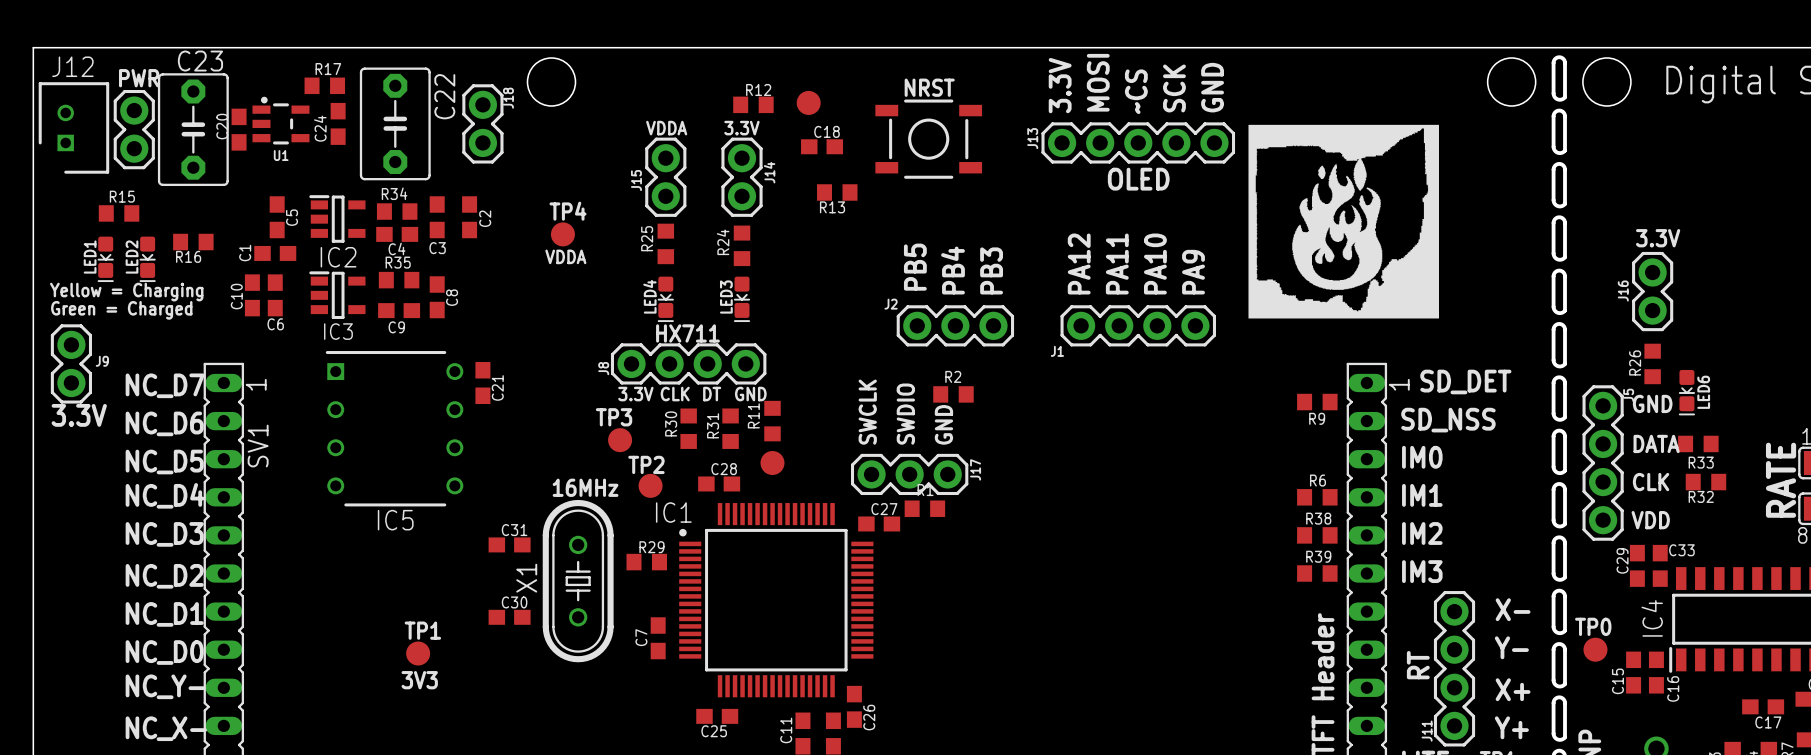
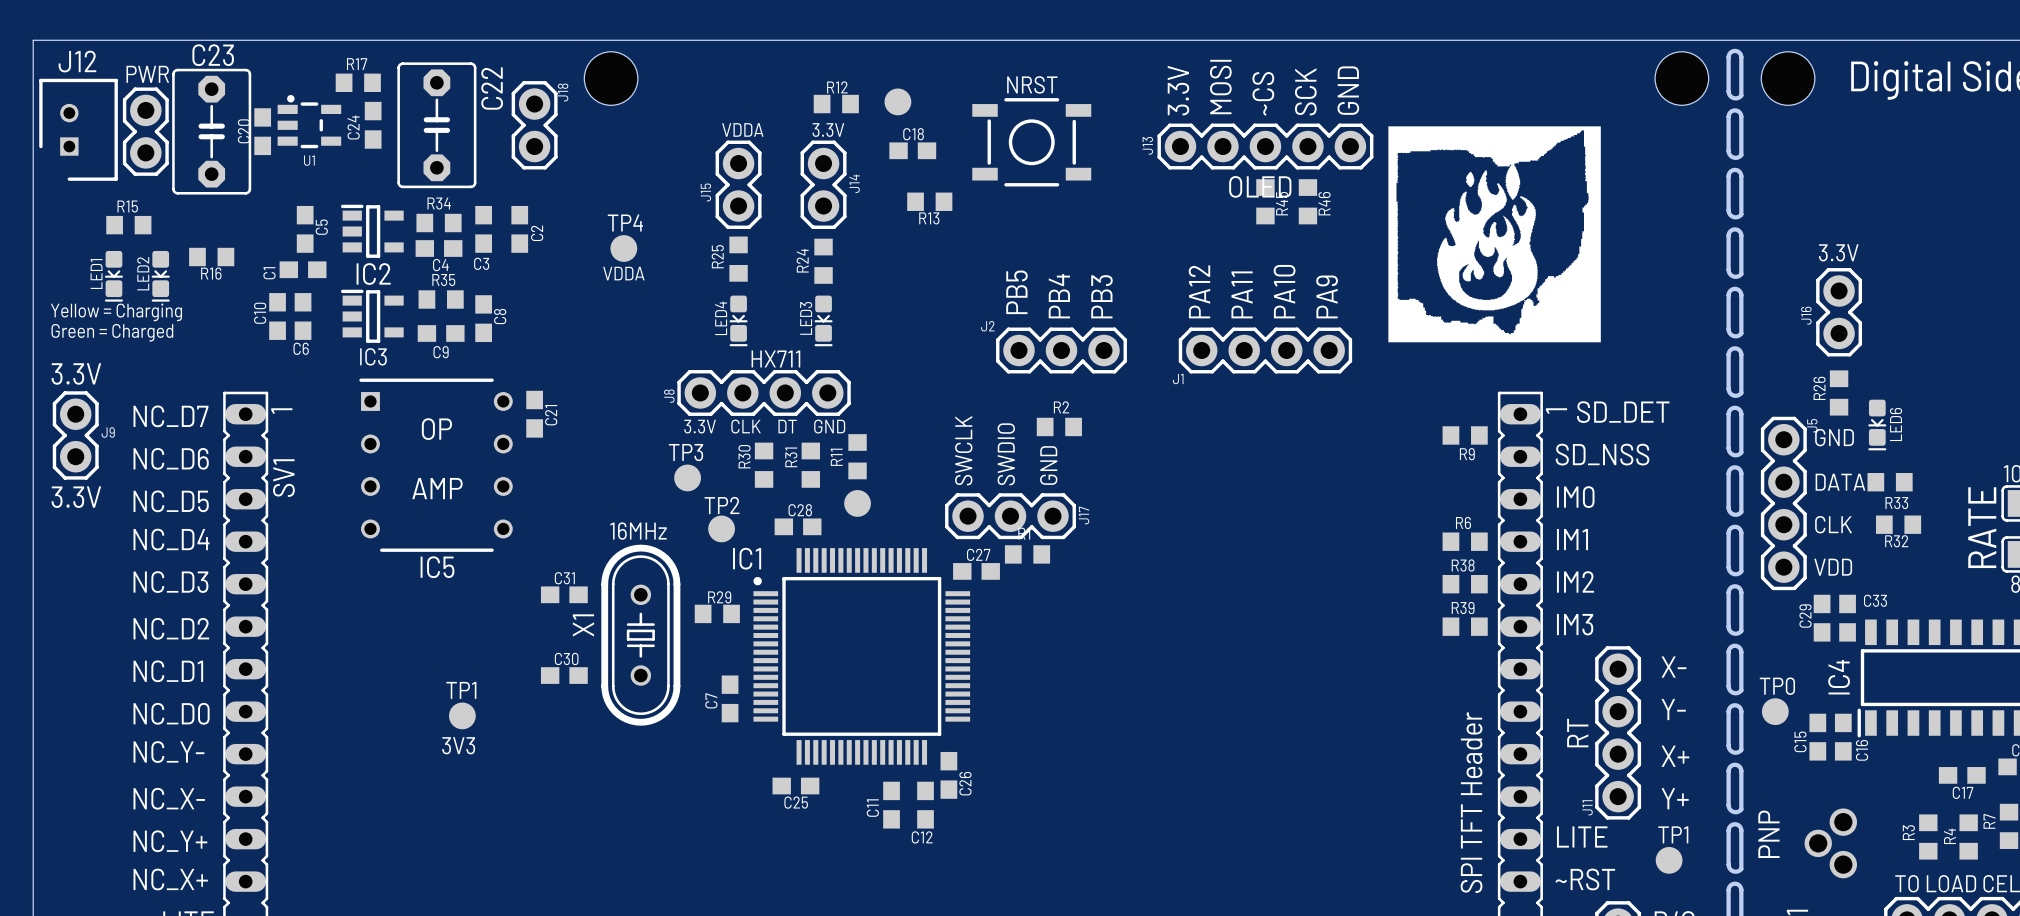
R45: none -> (1265, 201)
R46: none -> (1307, 201)
text: none -> 3.3V (76, 373)
J9 position: (71, 363) -> (75, 435)
text: none -> OP (436, 429)
text: 3.3V (79, 415) -> none
text: none -> AMP (437, 488)
text: none -> 3.3V (76, 497)

